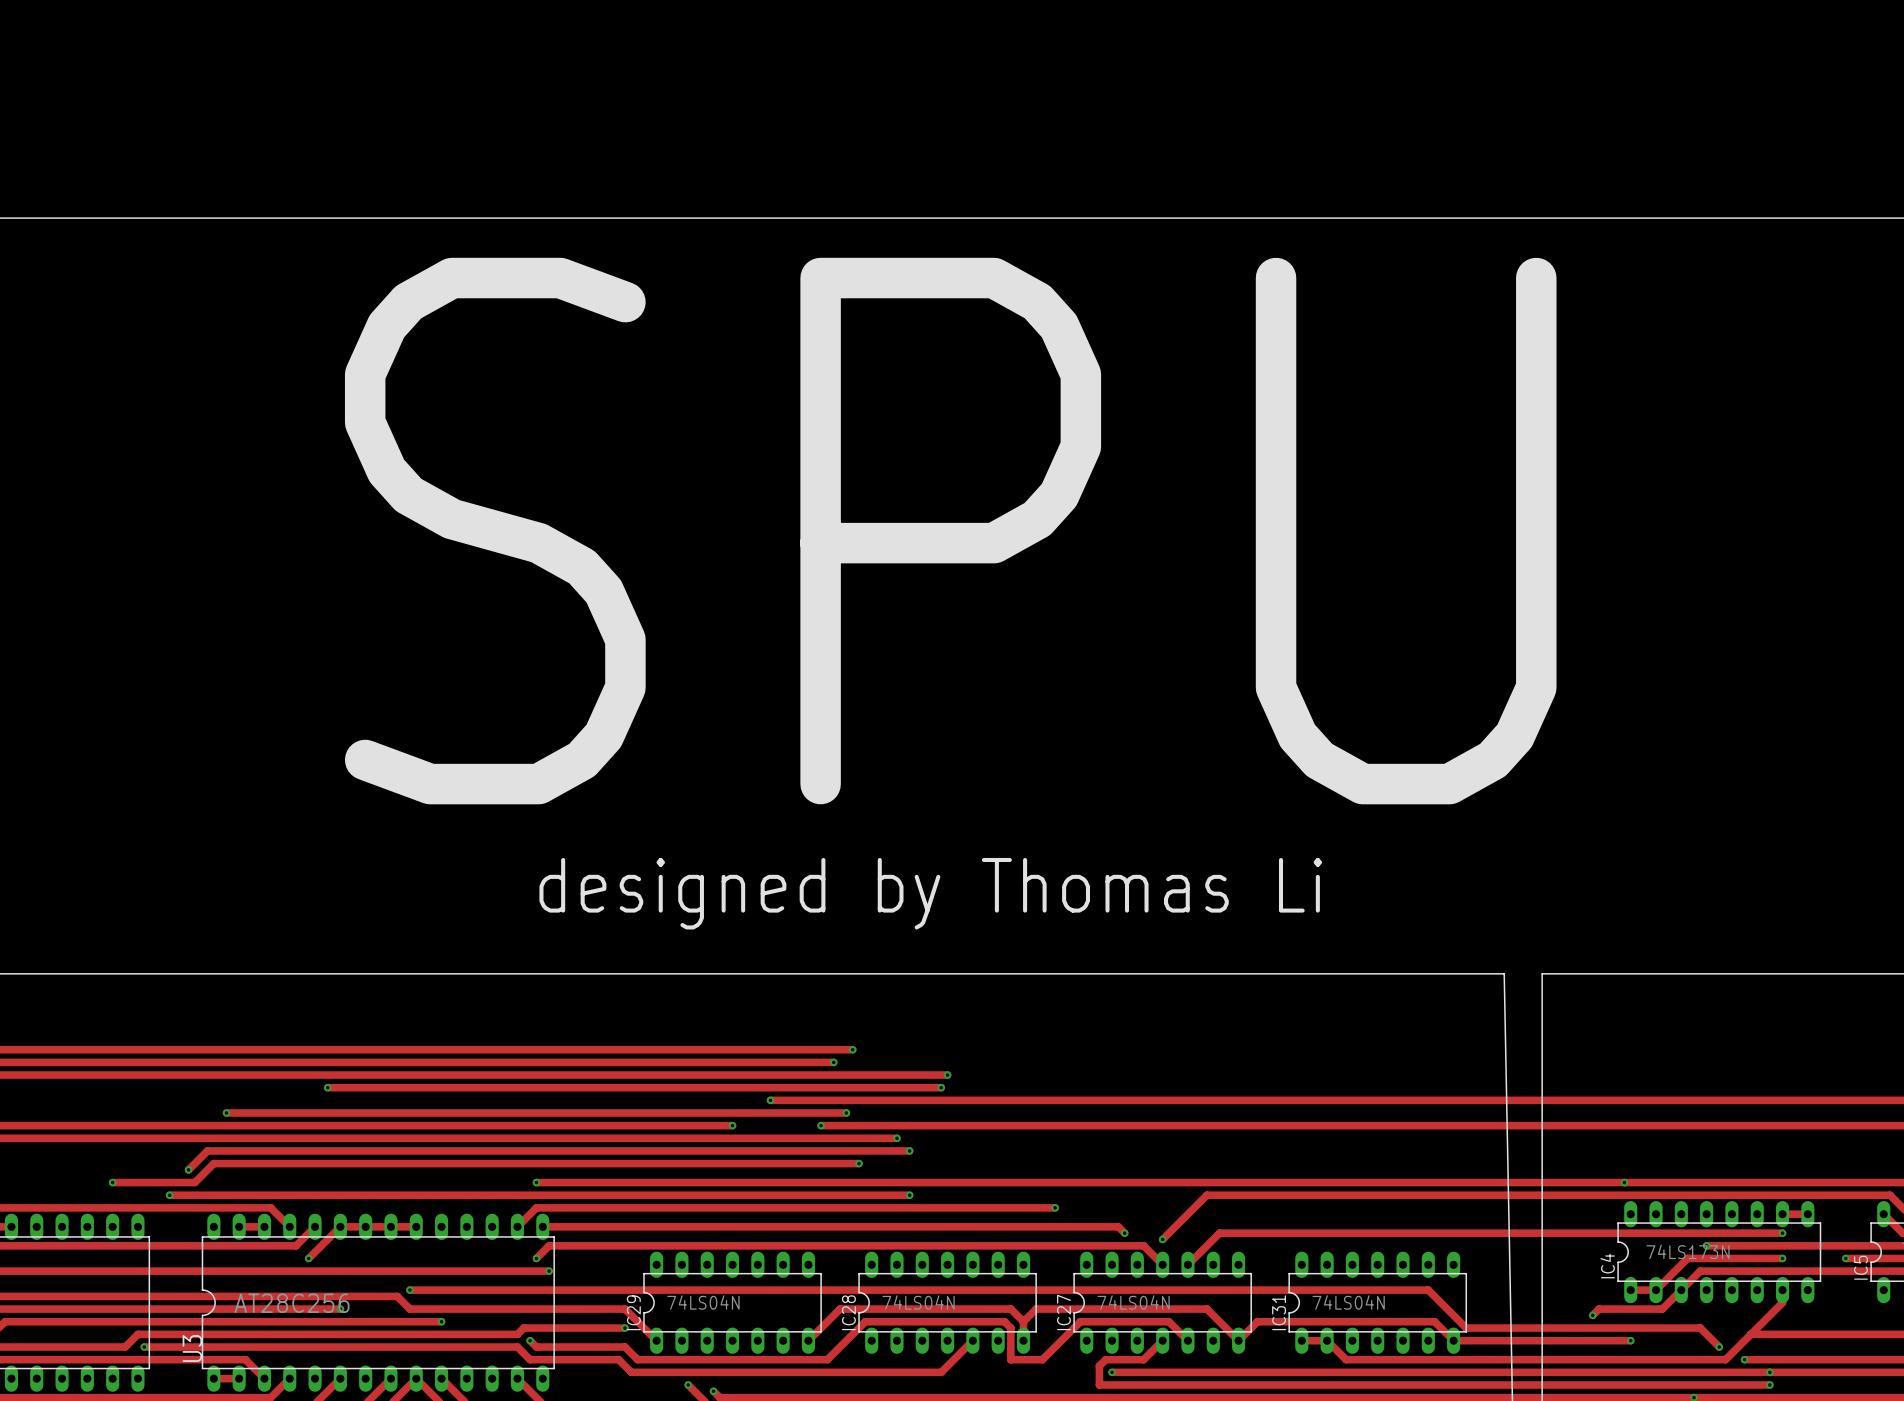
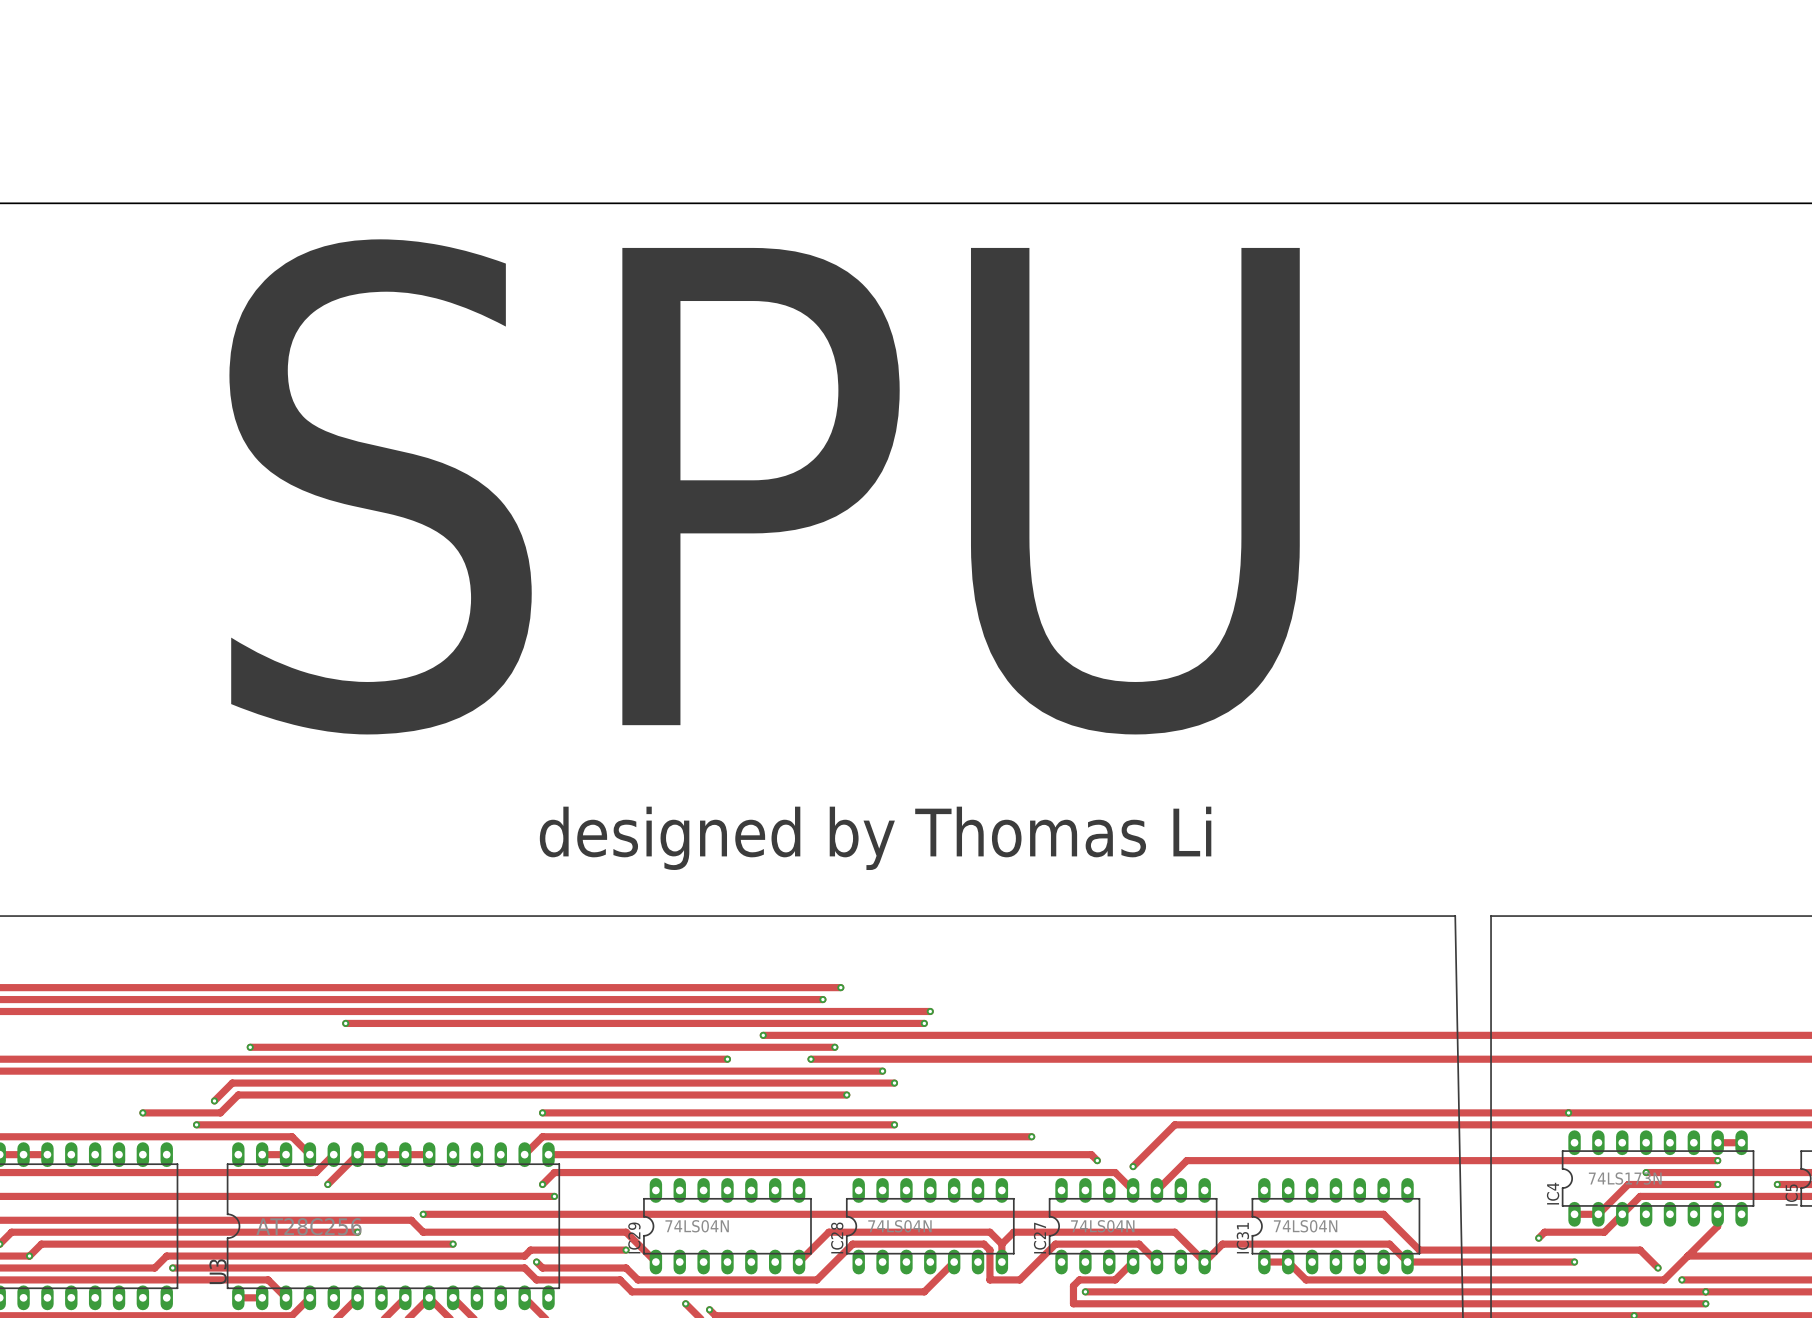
text position: SPU (950, 531) -> SPU (764, 486)

